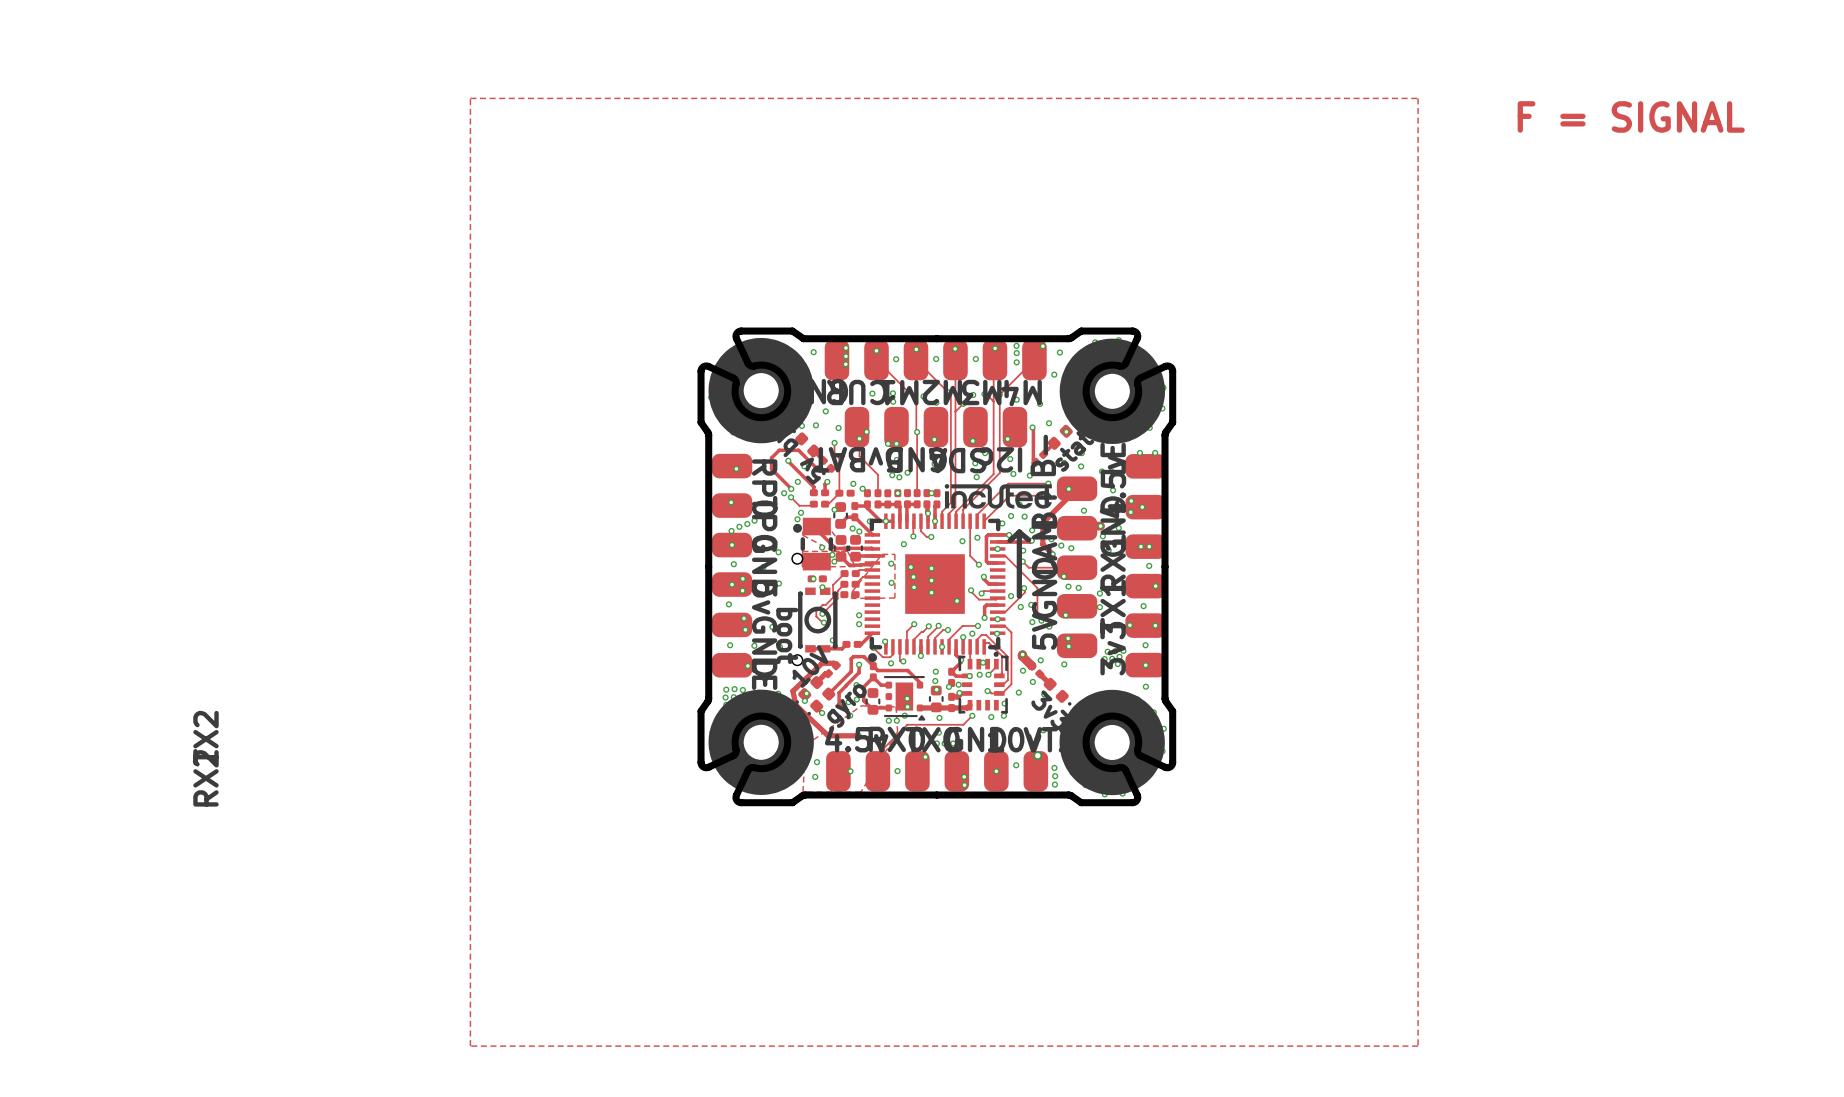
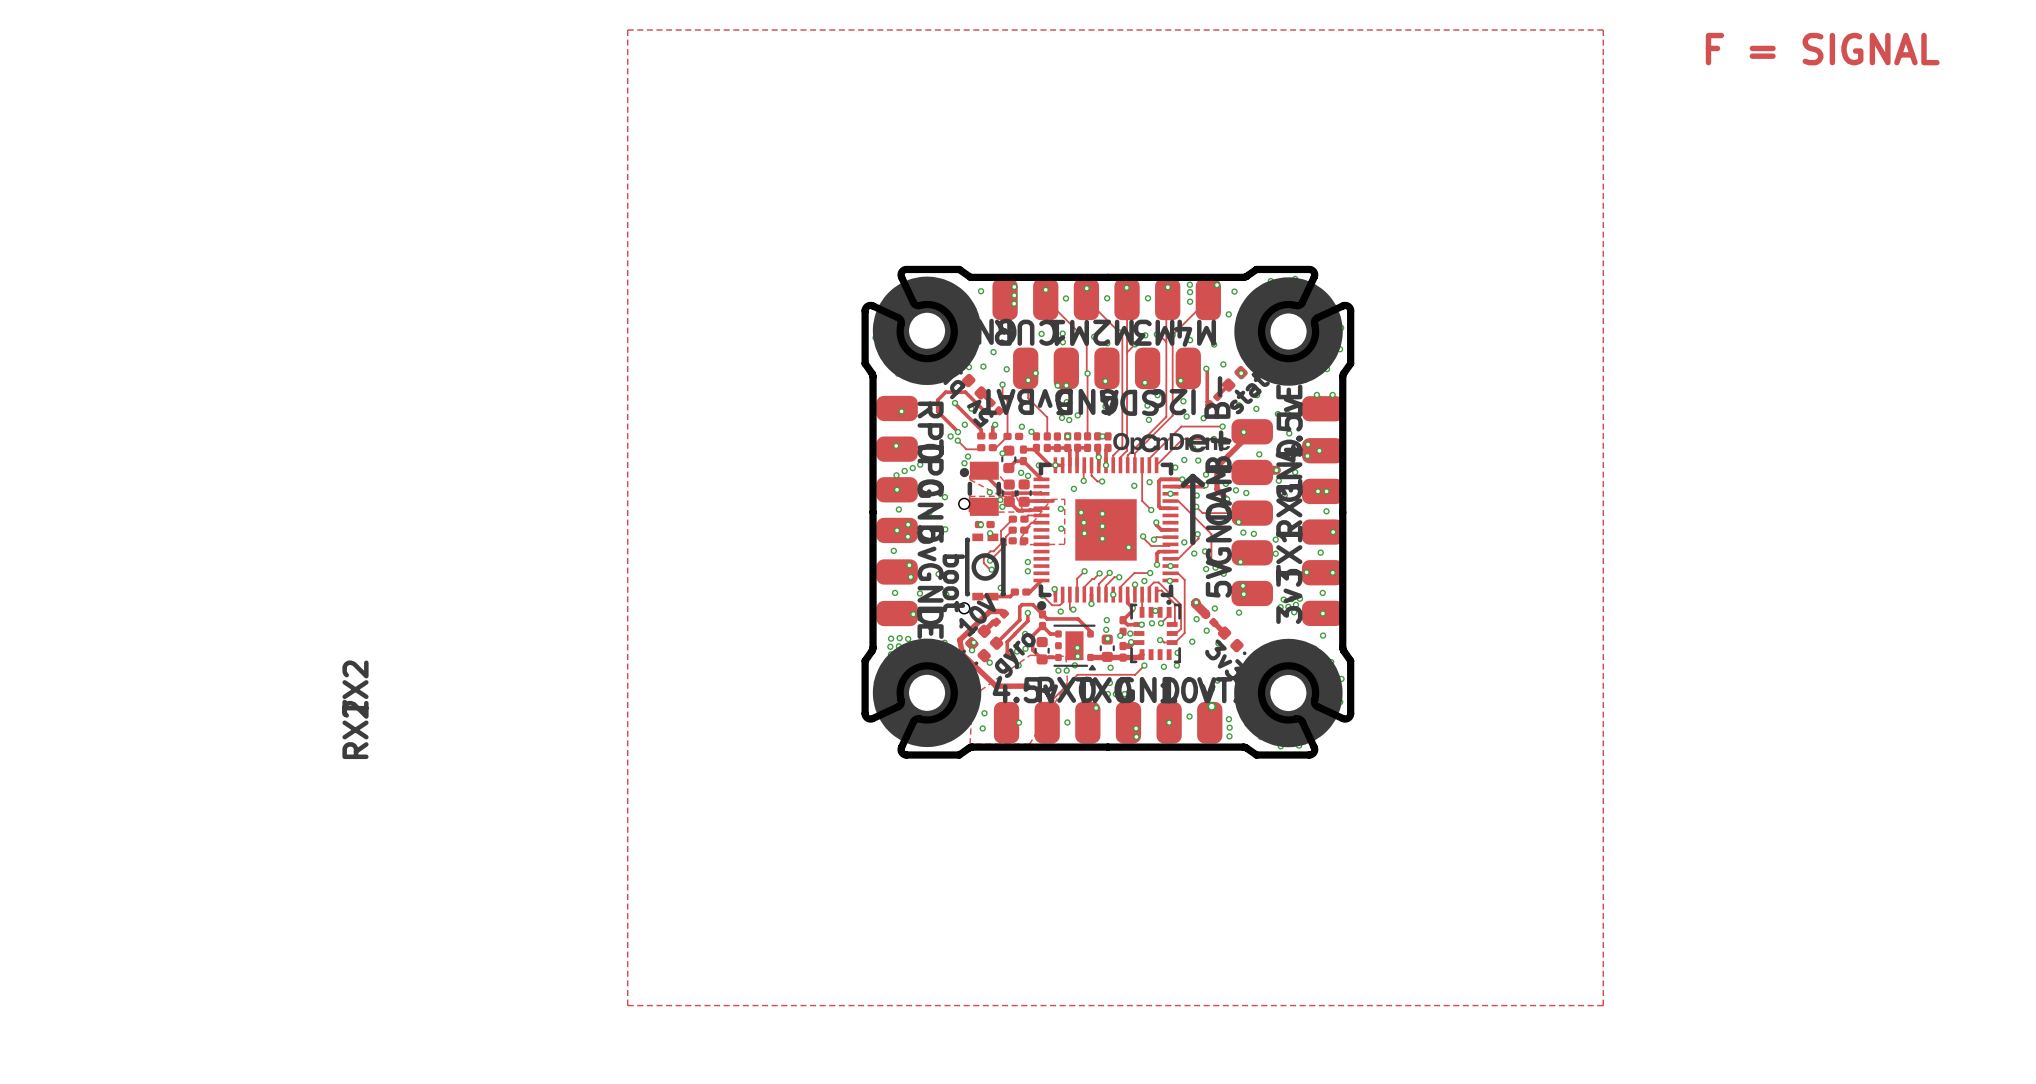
drawing: [944, 484, 1052, 509] -> none
drawing: none -> [1130, 433, 1231, 454]
drawing shape: [944, 491, 950, 509] -> [1113, 432, 1130, 451]

